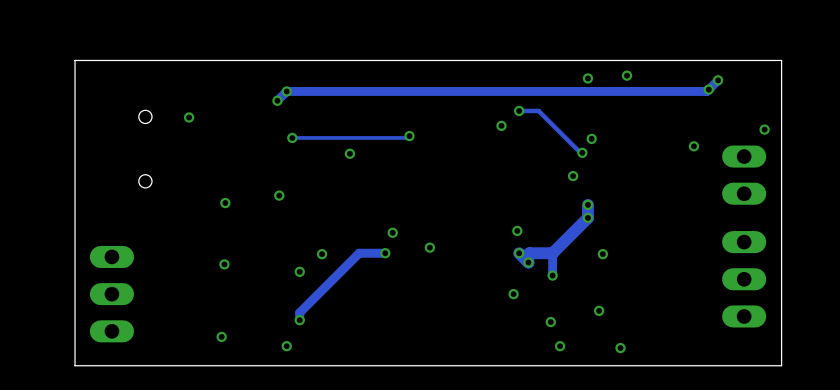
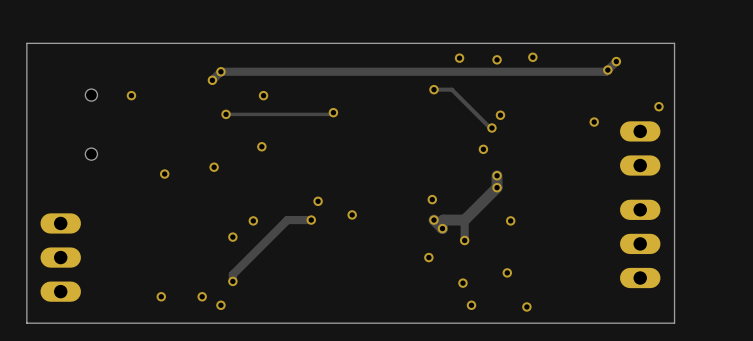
via: none -> (263, 95)
via position: (501, 125) -> (459, 58)
via: (349, 153) -> none
via: none -> (261, 146)
via: (224, 264) -> none
via: none -> (202, 296)

